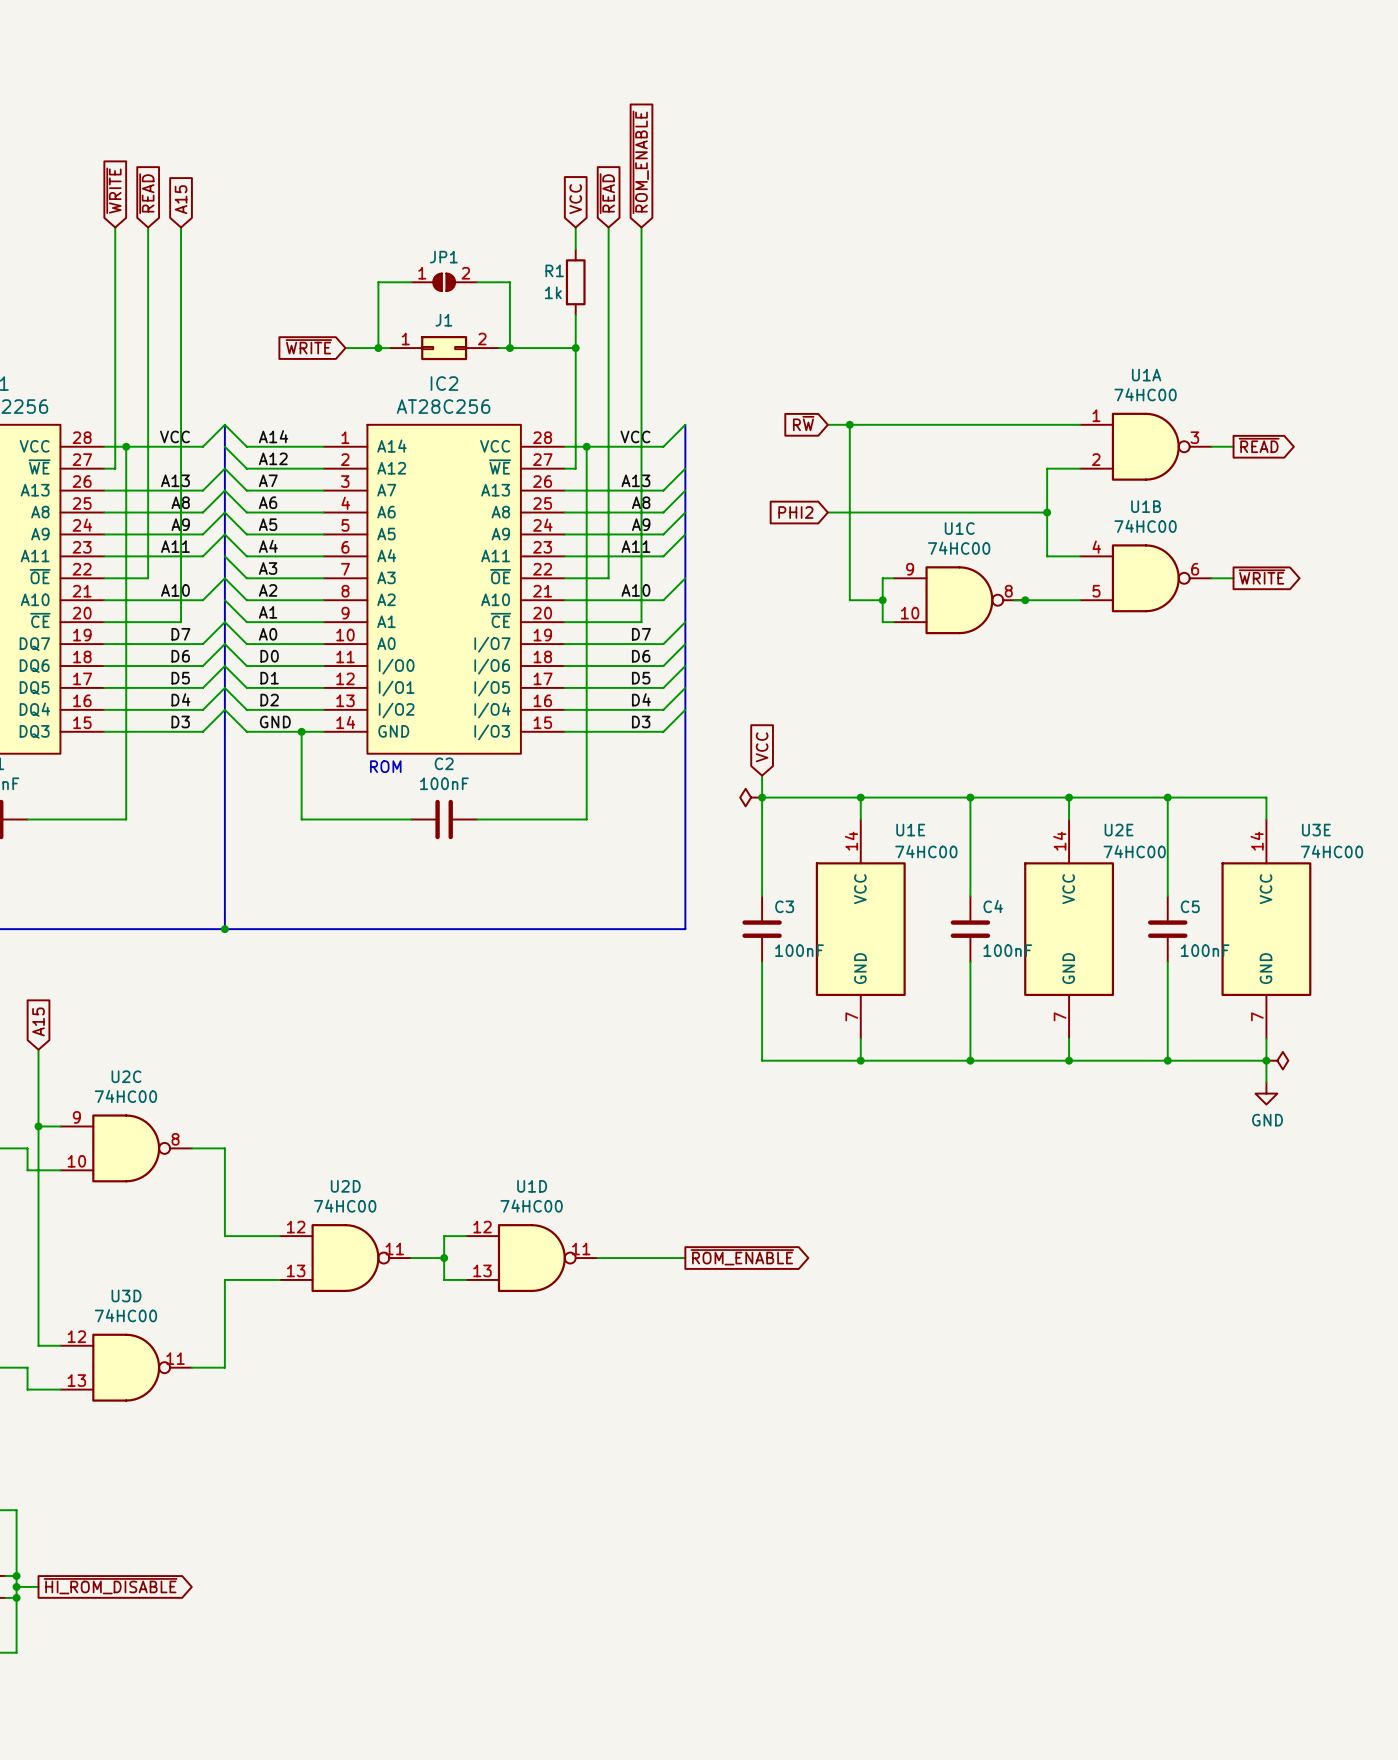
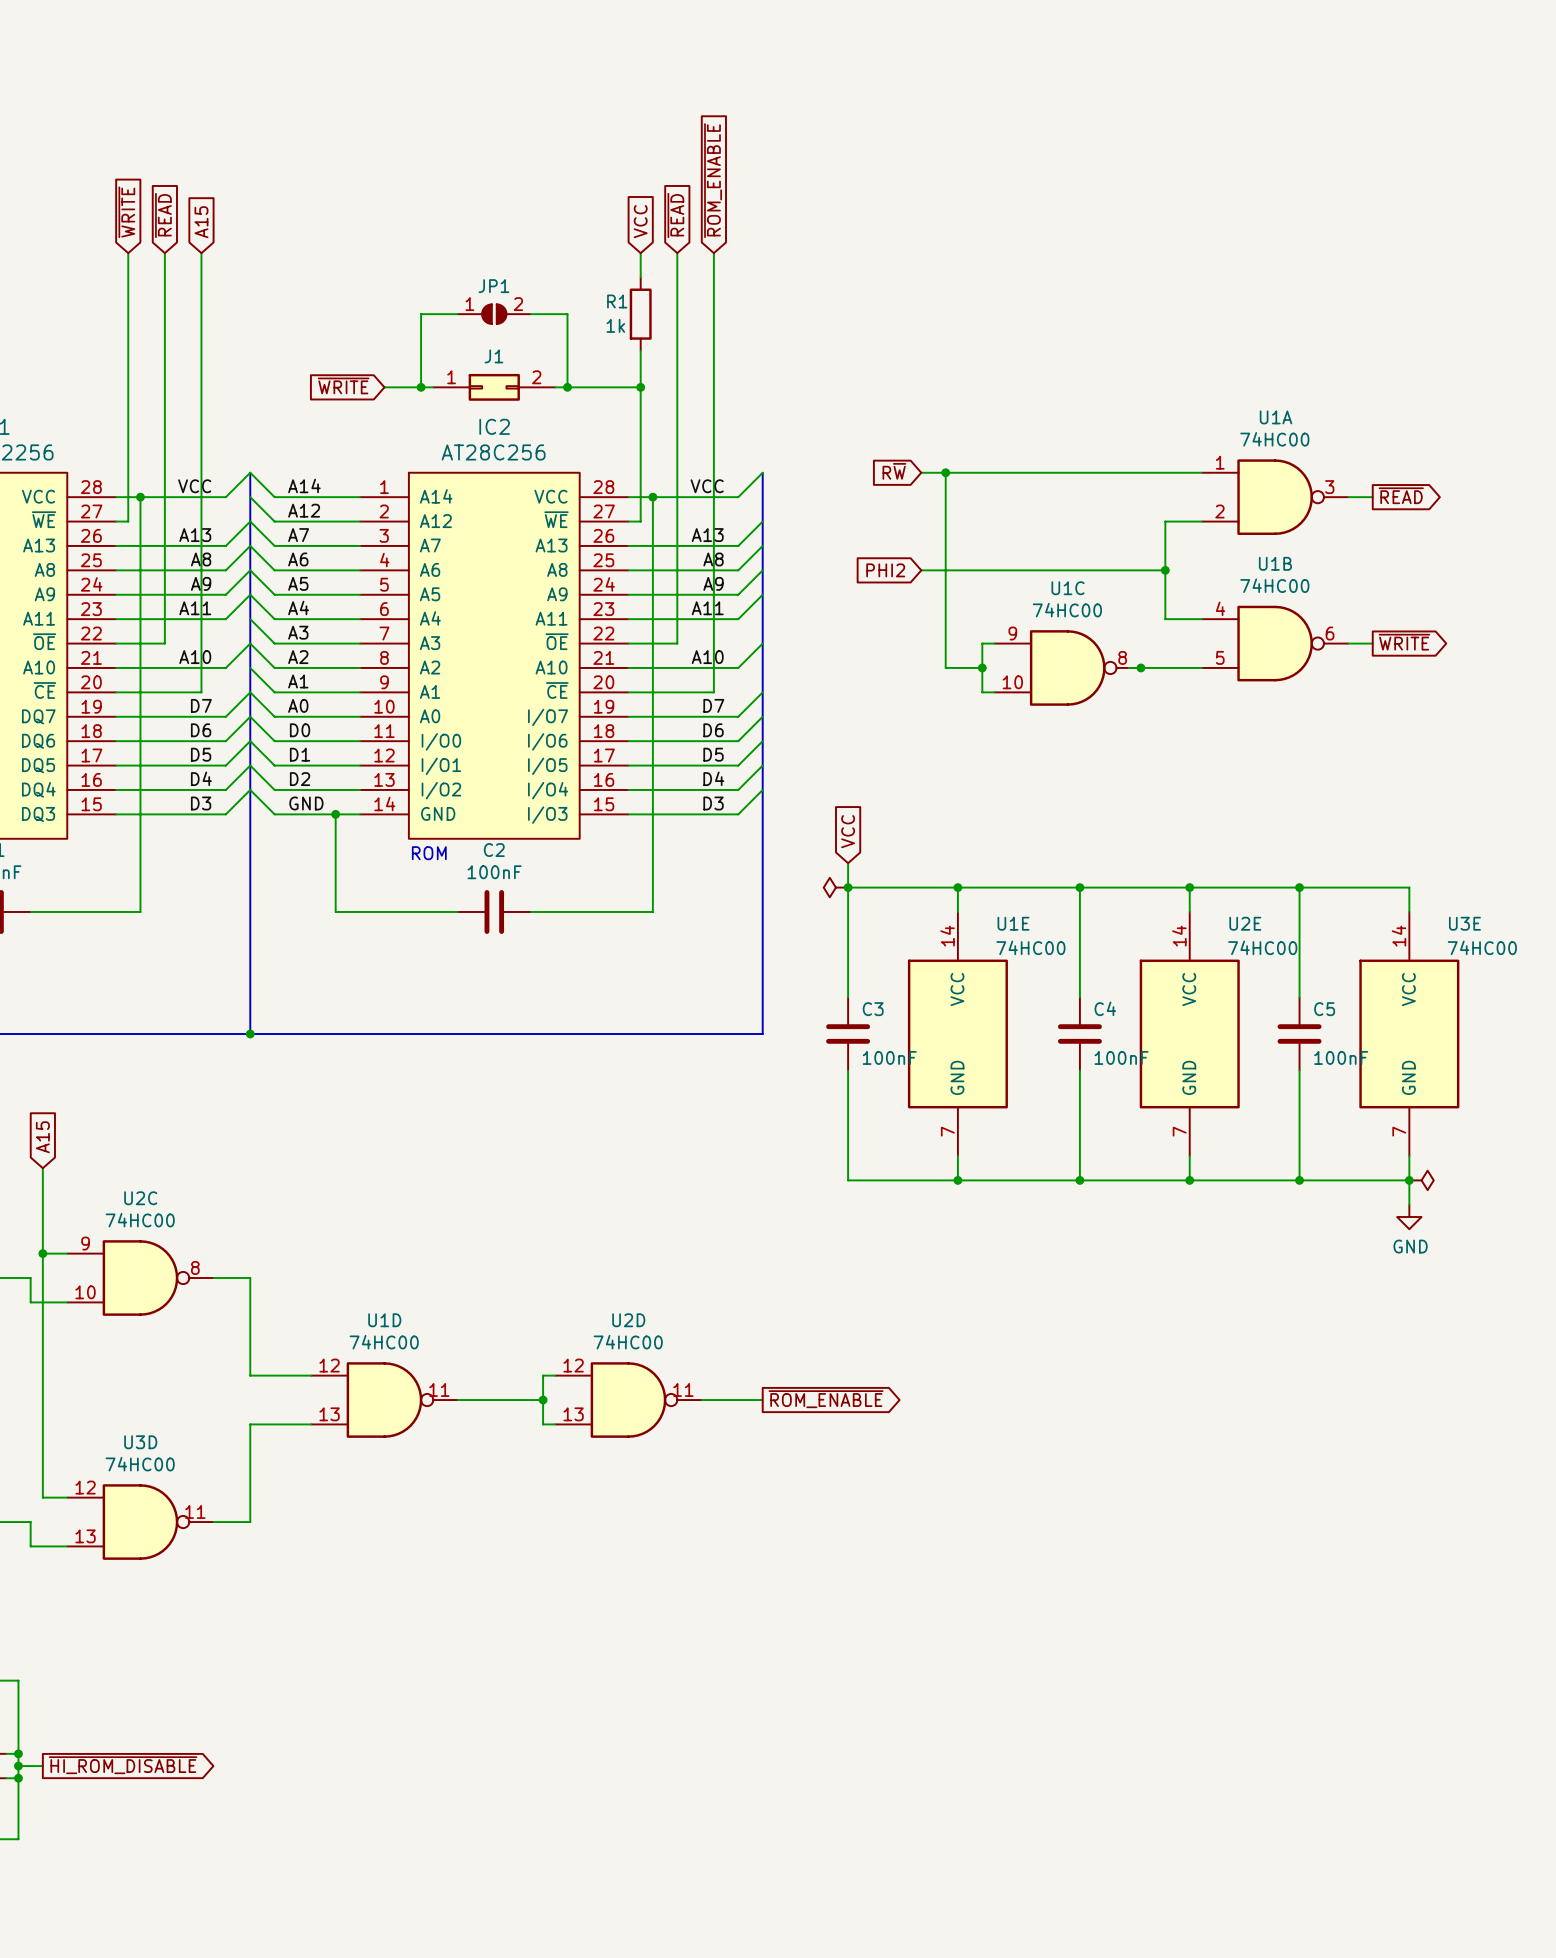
U2D name: U2D (345, 1186) -> U1D (384, 1320)
wire: (466, 1236) (444, 1236) (444, 1279) (466, 1279) -> none
wire: none -> (555, 1375) (543, 1375) (543, 1424) (555, 1424)
wire: none -> (494, 1400) (543, 1400)
junction position: (444, 1258) -> (543, 1400)
U1D: 74HC00 (531, 1258) -> none
U2D: none -> 74HC00 (628, 1400)

